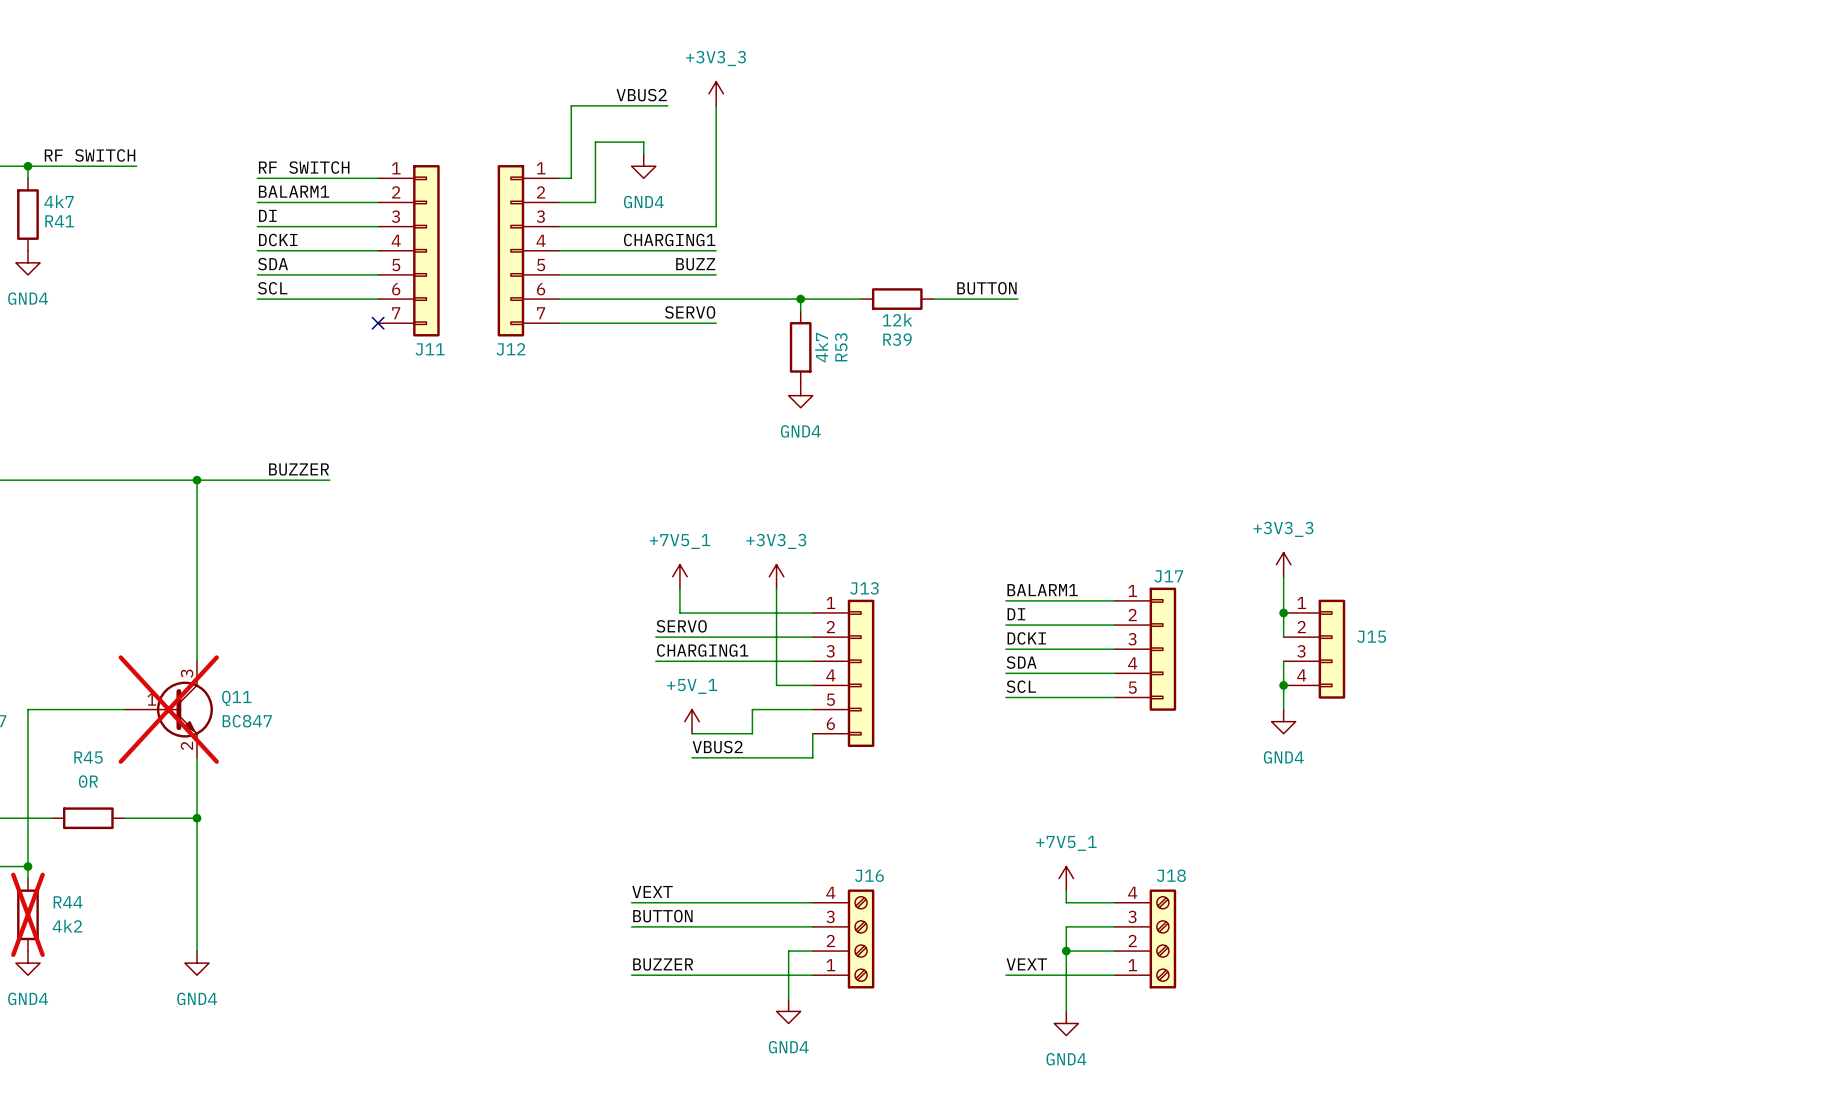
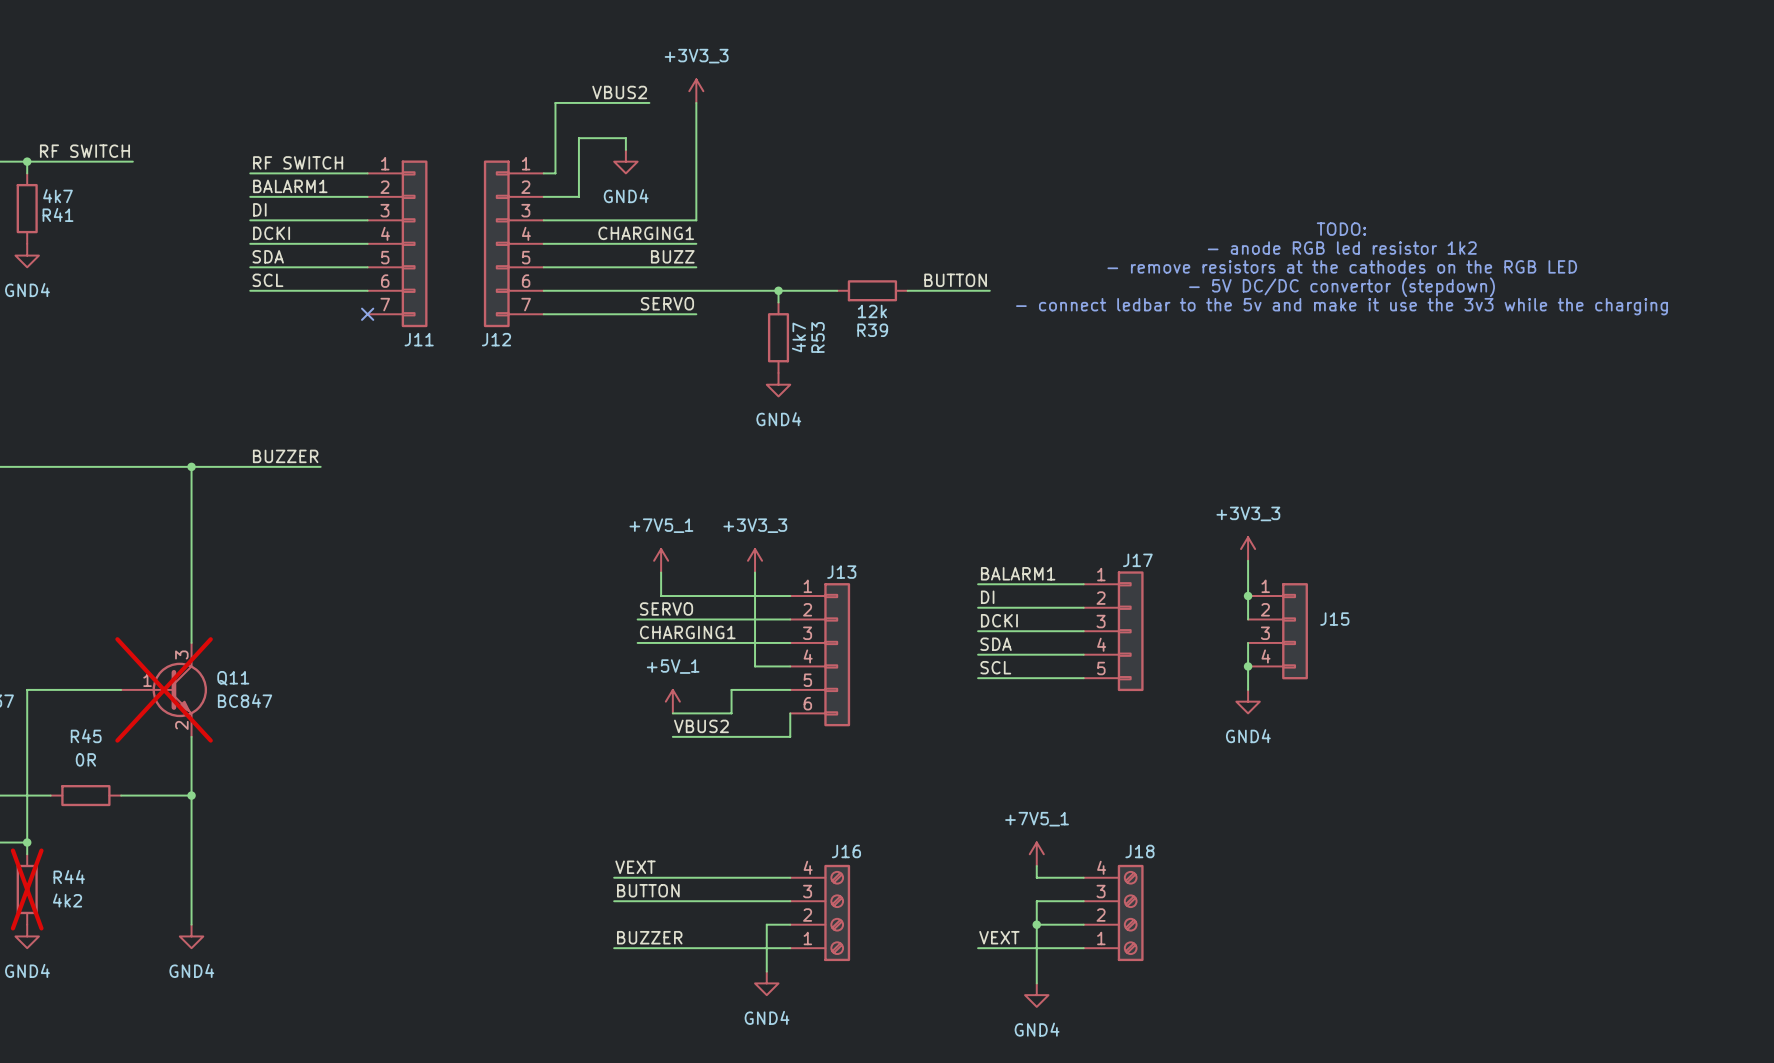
text: none -> TODO: (1341, 229)
text: none -> - anode RGB led resistor 1k2 (1342, 248)
text: none -> - remove resistors at the cathodes on the RGB LED (1342, 266)
text: none -> - 5V DC/DC convertor (stepdown) (1341, 287)
text: none -> - connect ledbar to the 5v and make it use the 3v3 while the charging (1341, 306)

